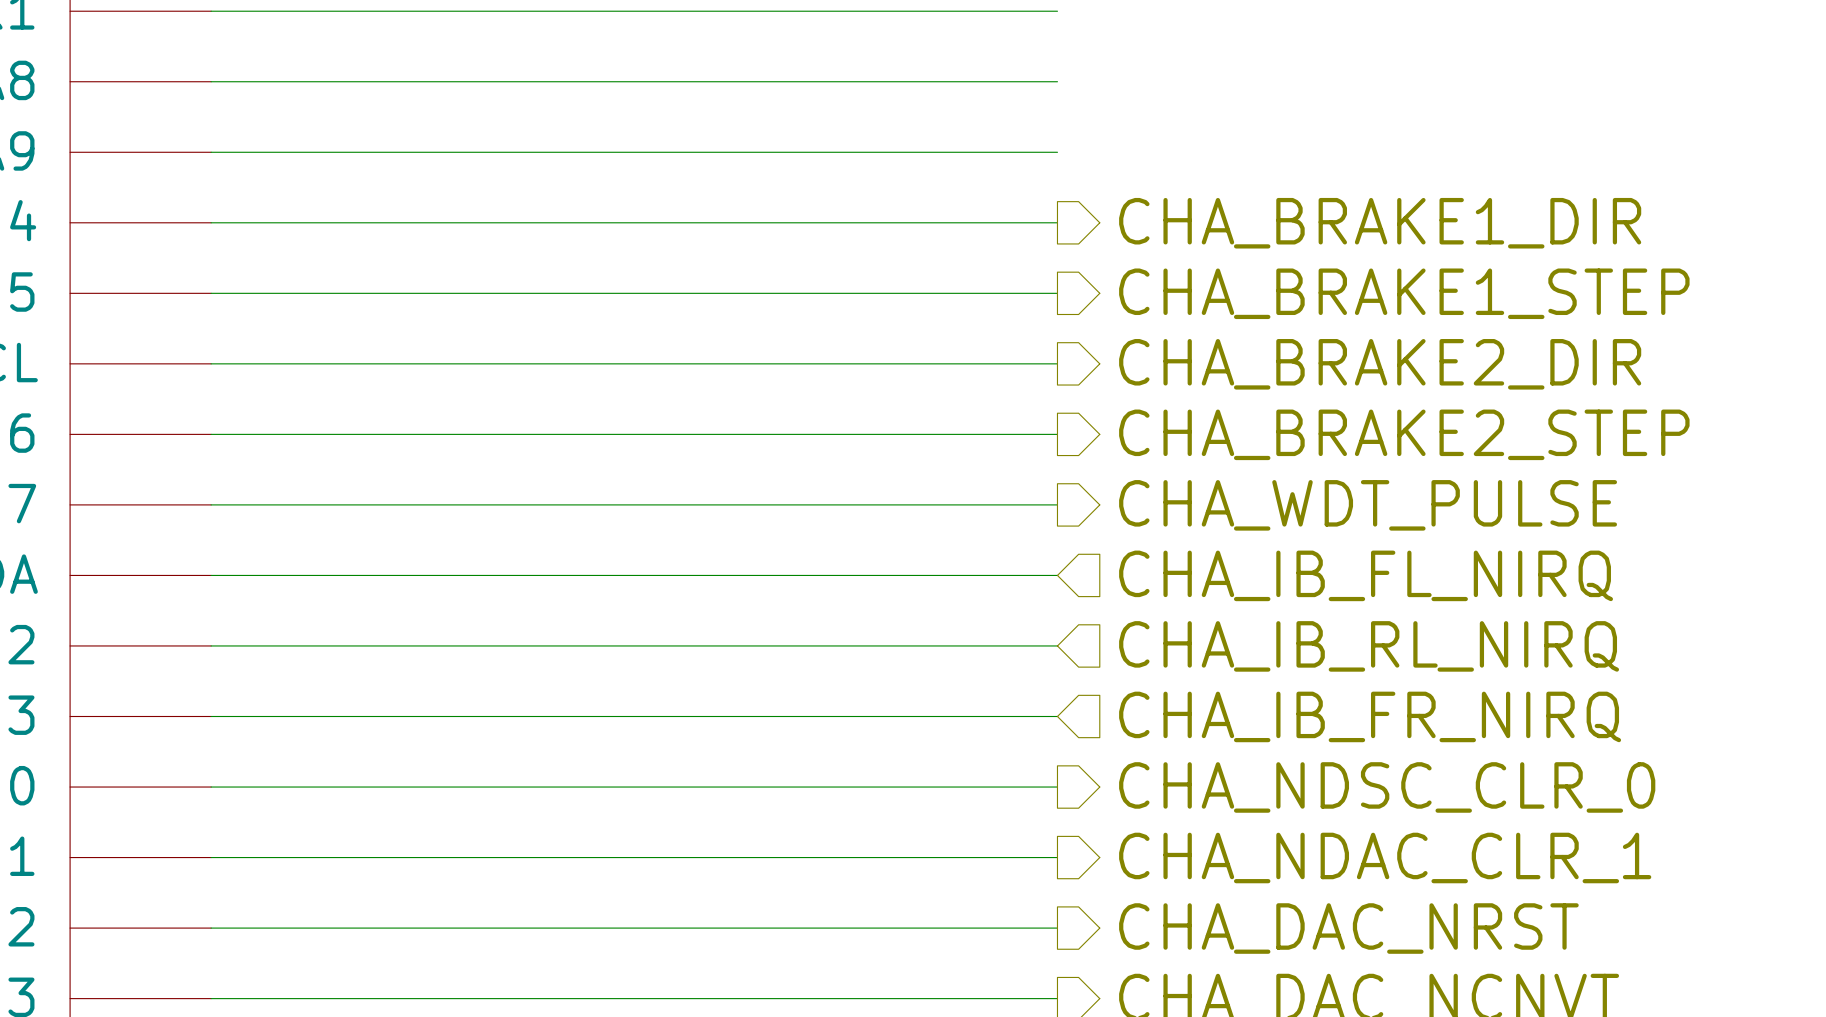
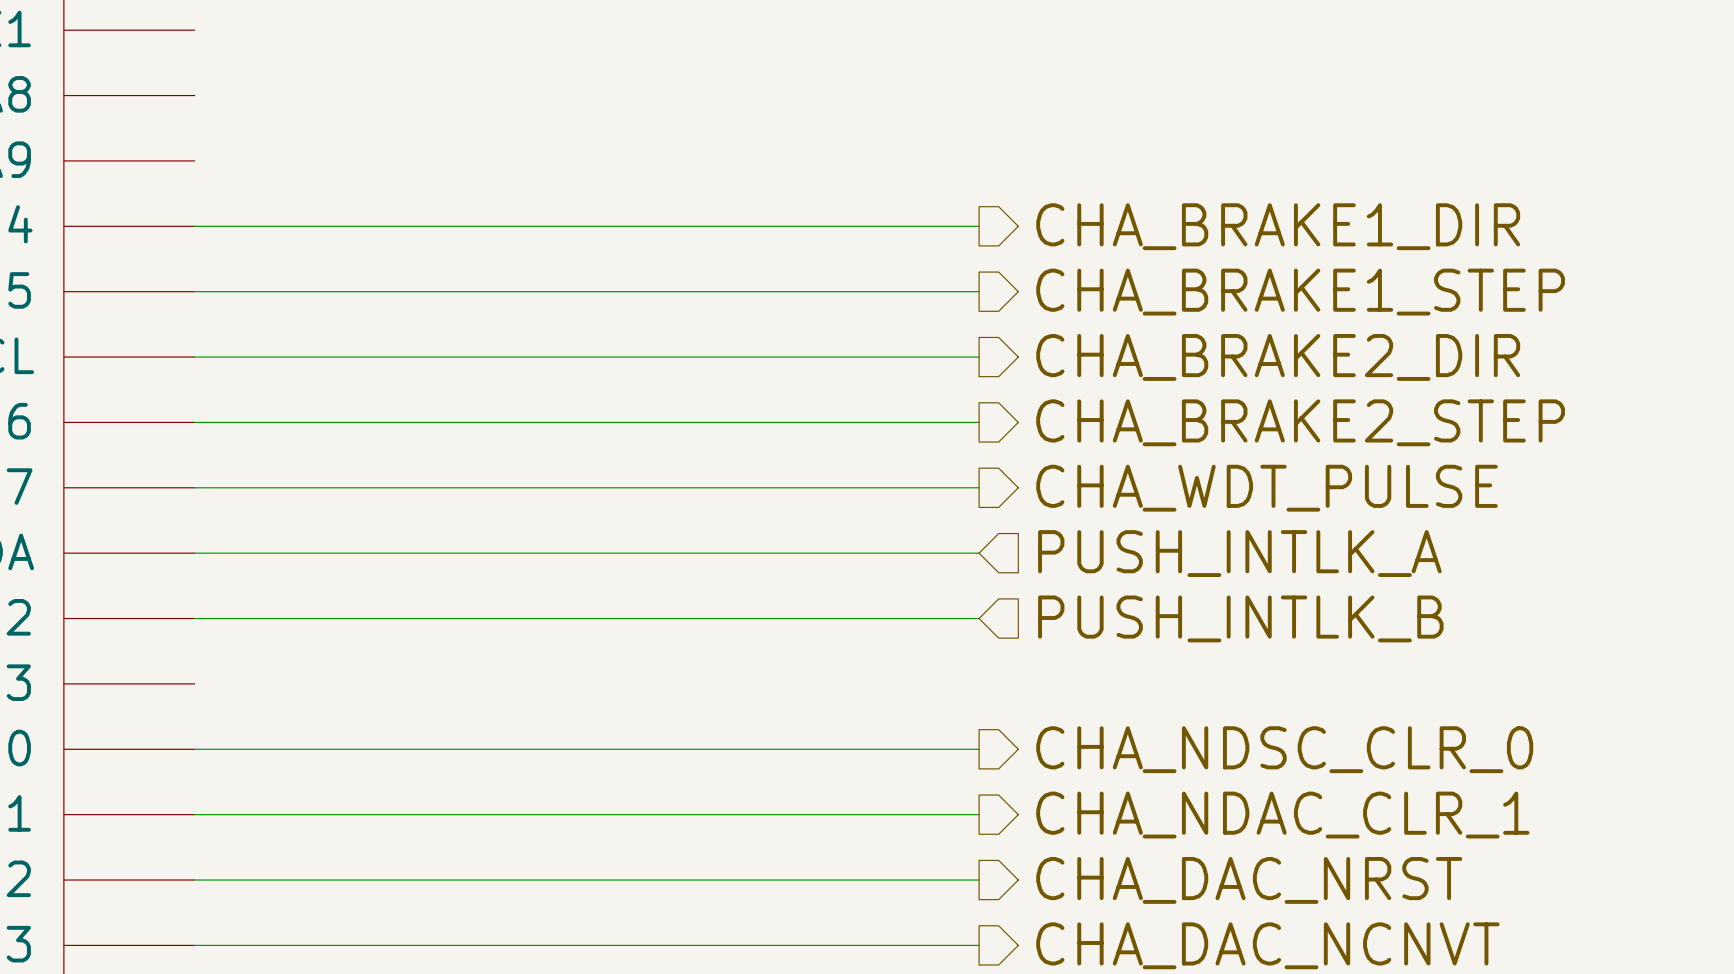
wire: (211, 11) (1057, 11) -> none
wire: (211, 81) (1057, 81) -> none
wire: (211, 152) (1057, 152) -> none
hierarchical label: CHA_IB_FL_NIRQ (1366, 575) -> PUSH_INTLK_A (1239, 553)
hierarchical label: CHA_IB_RL_NIRQ (1369, 646) -> PUSH_INTLK_B (1240, 618)
wire: (211, 716) (1057, 716) -> none
hierarchical label: CHA_IB_FR_NIRQ (1370, 716) -> none

